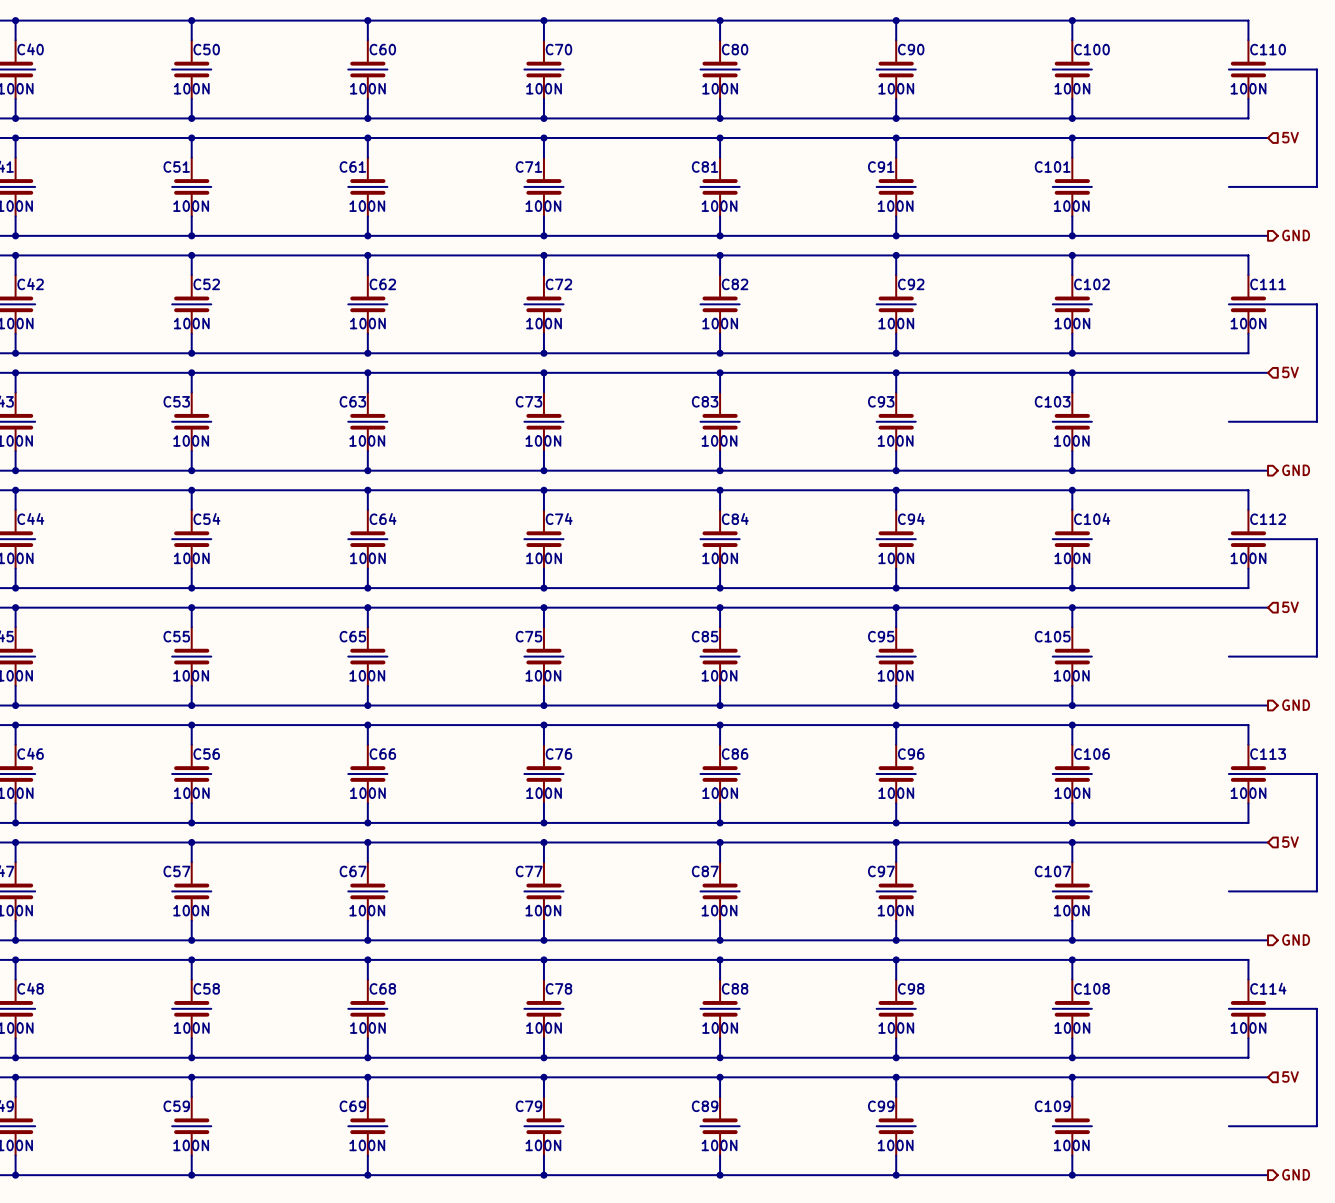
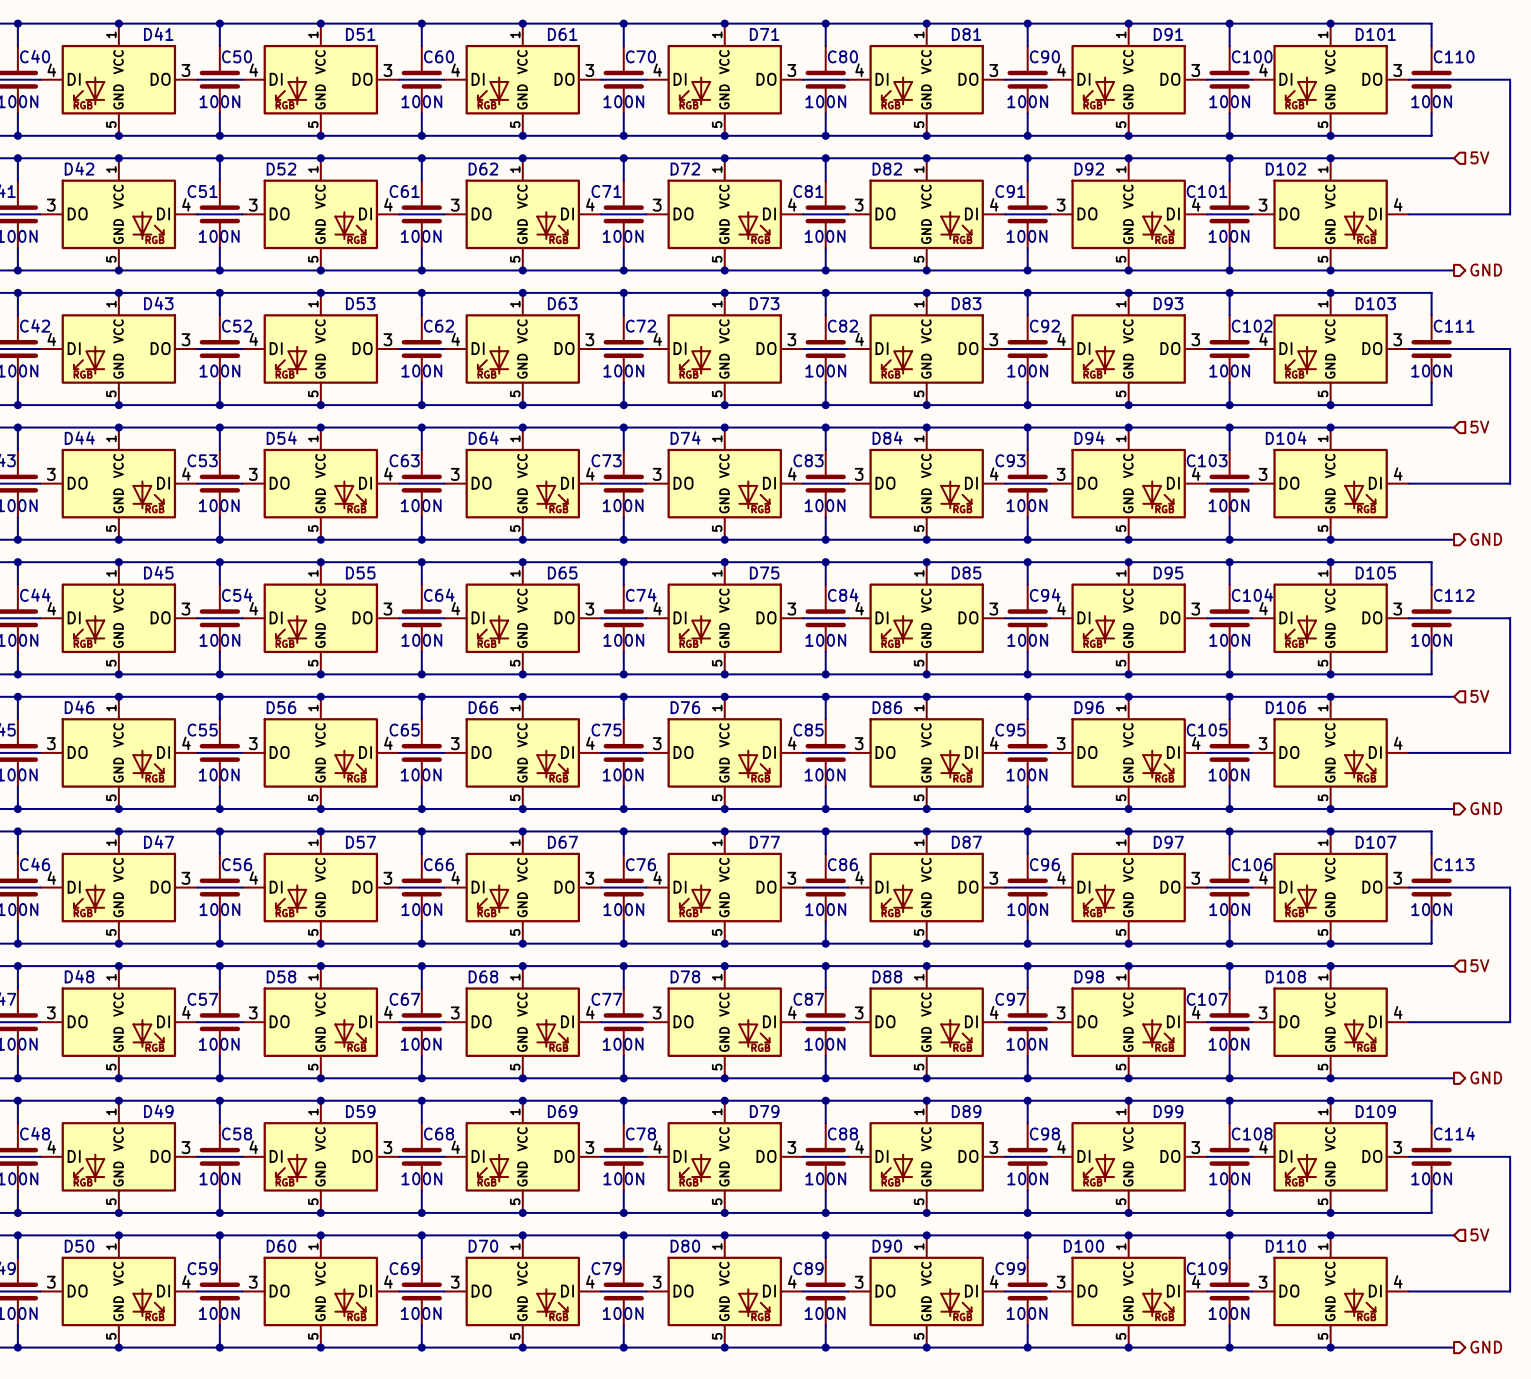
junction: none -> (118, 23)
junction: none -> (320, 23)
junction: none -> (522, 23)
junction: none -> (724, 23)
junction: none -> (926, 23)
junction: none -> (1128, 23)
junction: none -> (1330, 23)
D41: none -> (118, 79)
D51: none -> (320, 79)
D61: none -> (522, 79)
D71: none -> (724, 79)
D81: none -> (926, 79)
D91: none -> (1128, 79)
D101: none -> (1330, 79)
junction: none -> (118, 135)
junction: none -> (320, 135)
junction: none -> (522, 135)
junction: none -> (724, 135)
junction: none -> (926, 135)
junction: none -> (1128, 135)
junction: none -> (1330, 135)
junction: none -> (118, 158)
junction: none -> (320, 158)
junction: none -> (522, 158)
junction: none -> (724, 158)
junction: none -> (926, 158)
junction: none -> (1128, 158)
junction: none -> (1330, 158)
D42: none -> (118, 214)
D52: none -> (320, 214)
D62: none -> (522, 214)
D72: none -> (724, 214)
D82: none -> (926, 214)
D92: none -> (1128, 214)
D102: none -> (1330, 214)
junction: none -> (118, 270)
junction: none -> (320, 270)
junction: none -> (522, 270)
junction: none -> (724, 270)
junction: none -> (926, 270)
junction: none -> (1128, 270)
junction: none -> (1330, 270)
junction: none -> (118, 292)
junction: none -> (320, 292)
junction: none -> (522, 292)
junction: none -> (724, 292)
junction: none -> (926, 292)
junction: none -> (1128, 292)
junction: none -> (1330, 292)
D43: none -> (118, 349)
D53: none -> (320, 349)
D63: none -> (522, 349)
D73: none -> (724, 349)
D83: none -> (926, 349)
D93: none -> (1128, 349)
D103: none -> (1330, 349)
junction: none -> (118, 405)
junction: none -> (320, 405)
junction: none -> (522, 405)
junction: none -> (724, 405)
junction: none -> (926, 405)
junction: none -> (1128, 405)
junction: none -> (1330, 405)
junction: none -> (118, 427)
junction: none -> (320, 427)
junction: none -> (522, 427)
junction: none -> (724, 427)
junction: none -> (926, 427)
junction: none -> (1128, 427)
junction: none -> (1330, 427)
D44: none -> (118, 483)
D54: none -> (320, 483)
D64: none -> (522, 483)
D74: none -> (724, 483)
D84: none -> (926, 483)
D94: none -> (1128, 483)
D104: none -> (1330, 483)
junction: none -> (118, 539)
junction: none -> (320, 539)
junction: none -> (522, 539)
junction: none -> (724, 539)
junction: none -> (926, 539)
junction: none -> (1128, 539)
junction: none -> (1330, 539)
junction: none -> (118, 562)
junction: none -> (320, 562)
junction: none -> (522, 562)
junction: none -> (724, 562)
junction: none -> (926, 562)
junction: none -> (1128, 562)
junction: none -> (1330, 562)
D45: none -> (118, 618)
D55: none -> (320, 618)
D65: none -> (522, 618)
D75: none -> (724, 618)
D85: none -> (926, 618)
D95: none -> (1128, 618)
D105: none -> (1330, 618)
junction: none -> (118, 674)
junction: none -> (320, 674)
junction: none -> (522, 674)
junction: none -> (724, 674)
junction: none -> (926, 674)
junction: none -> (1128, 674)
junction: none -> (1330, 674)
junction: none -> (118, 696)
junction: none -> (320, 696)
junction: none -> (522, 696)
junction: none -> (724, 696)
junction: none -> (926, 696)
junction: none -> (1128, 696)
junction: none -> (1330, 696)
D46: none -> (118, 752)
D56: none -> (320, 752)
D66: none -> (522, 752)
D76: none -> (724, 752)
D86: none -> (926, 752)
D96: none -> (1128, 752)
D106: none -> (1330, 752)
junction: none -> (118, 809)
junction: none -> (320, 809)
junction: none -> (522, 809)
junction: none -> (724, 809)
junction: none -> (926, 809)
junction: none -> (1128, 809)
junction: none -> (1330, 809)
junction: none -> (118, 831)
junction: none -> (320, 831)
junction: none -> (522, 831)
junction: none -> (724, 831)
junction: none -> (926, 831)
junction: none -> (1128, 831)
junction: none -> (1330, 831)
D47: none -> (118, 887)
D57: none -> (320, 887)
D67: none -> (522, 887)
D77: none -> (724, 887)
D87: none -> (926, 887)
D97: none -> (1128, 887)
D107: none -> (1330, 887)
junction: none -> (118, 943)
junction: none -> (320, 943)
junction: none -> (522, 943)
junction: none -> (724, 943)
junction: none -> (926, 943)
junction: none -> (1128, 943)
junction: none -> (1330, 943)
junction: none -> (118, 966)
junction: none -> (320, 966)
junction: none -> (522, 966)
junction: none -> (724, 966)
junction: none -> (926, 966)
junction: none -> (1128, 966)
junction: none -> (1330, 966)
D48: none -> (118, 1022)
D58: none -> (320, 1022)
D68: none -> (522, 1022)
D78: none -> (724, 1022)
D88: none -> (926, 1022)
D98: none -> (1128, 1022)
D108: none -> (1330, 1022)
junction: none -> (118, 1078)
junction: none -> (320, 1078)
junction: none -> (522, 1078)
junction: none -> (724, 1078)
junction: none -> (926, 1078)
junction: none -> (1128, 1078)
junction: none -> (1330, 1078)
junction: none -> (118, 1100)
junction: none -> (320, 1100)
junction: none -> (522, 1100)
junction: none -> (724, 1100)
junction: none -> (926, 1100)
junction: none -> (1128, 1100)
junction: none -> (1330, 1100)
D49: none -> (118, 1156)
D59: none -> (320, 1156)
D69: none -> (522, 1156)
D79: none -> (724, 1156)
D89: none -> (926, 1156)
D99: none -> (1128, 1156)
D109: none -> (1330, 1156)
junction: none -> (118, 1212)
junction: none -> (320, 1212)
junction: none -> (522, 1212)
junction: none -> (724, 1212)
junction: none -> (926, 1212)
junction: none -> (1128, 1212)
junction: none -> (1330, 1212)
junction: none -> (118, 1235)
junction: none -> (320, 1235)
junction: none -> (522, 1235)
junction: none -> (724, 1235)
junction: none -> (926, 1235)
junction: none -> (1128, 1235)
junction: none -> (1330, 1235)
D50: none -> (118, 1291)
D60: none -> (320, 1291)
D70: none -> (522, 1291)
D80: none -> (724, 1291)
D90: none -> (926, 1291)
D100: none -> (1128, 1291)
D110: none -> (1330, 1291)
junction: none -> (118, 1347)
junction: none -> (320, 1347)
junction: none -> (522, 1347)
junction: none -> (724, 1347)
junction: none -> (926, 1347)
junction: none -> (1128, 1347)
junction: none -> (1330, 1347)

